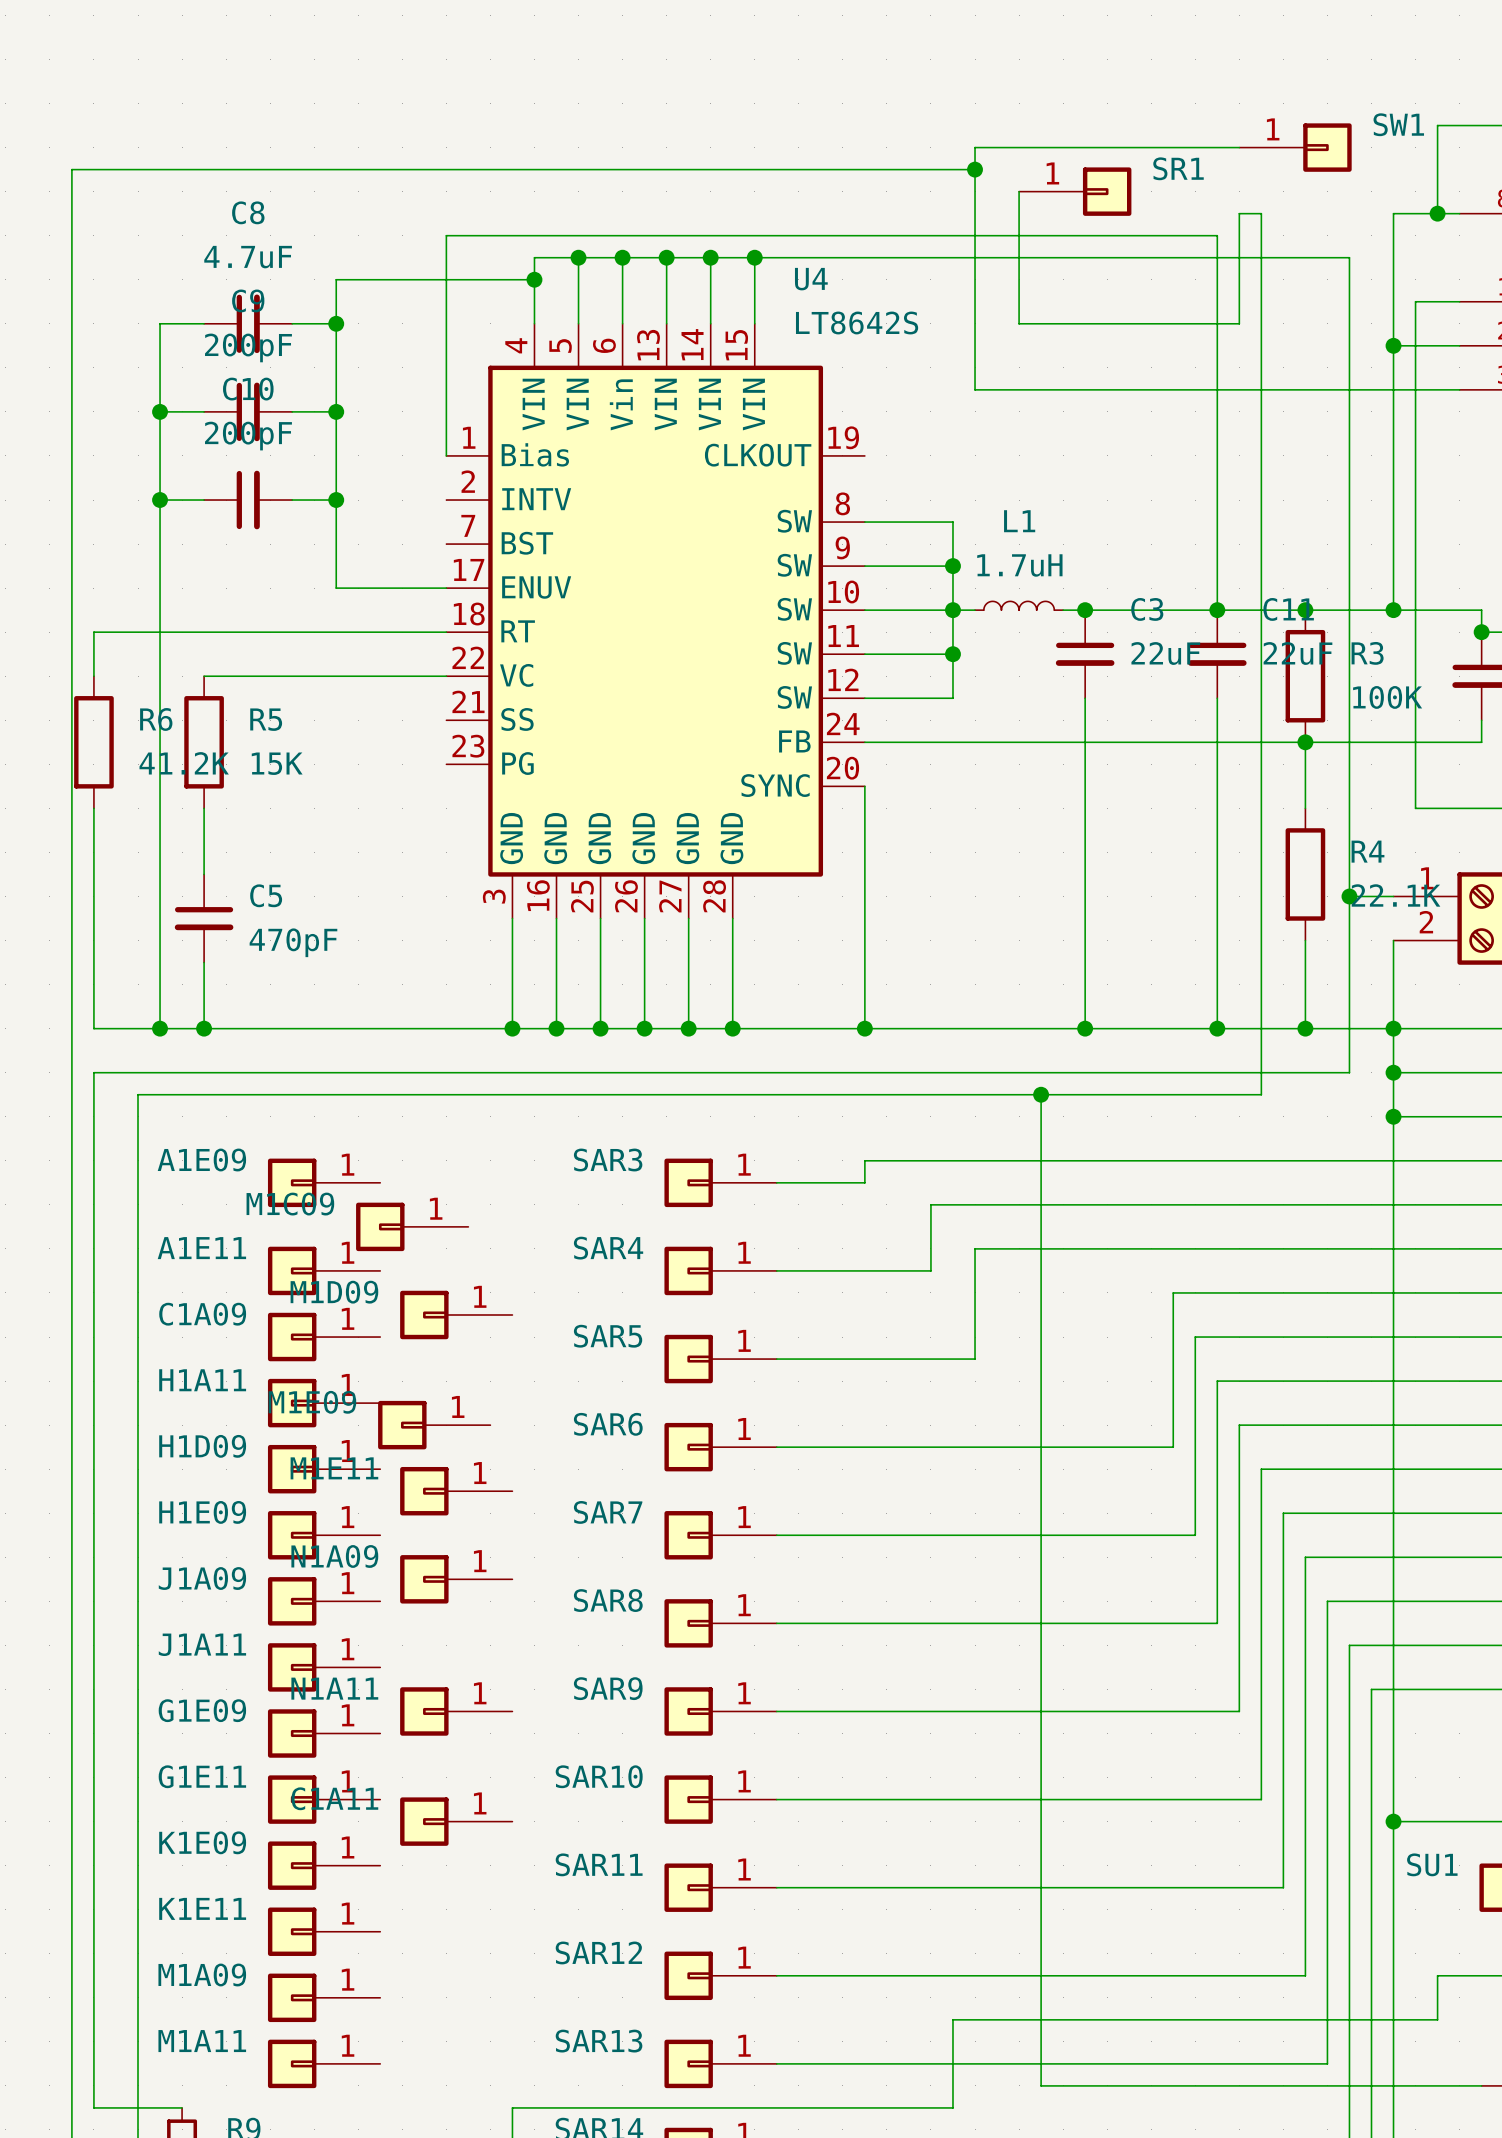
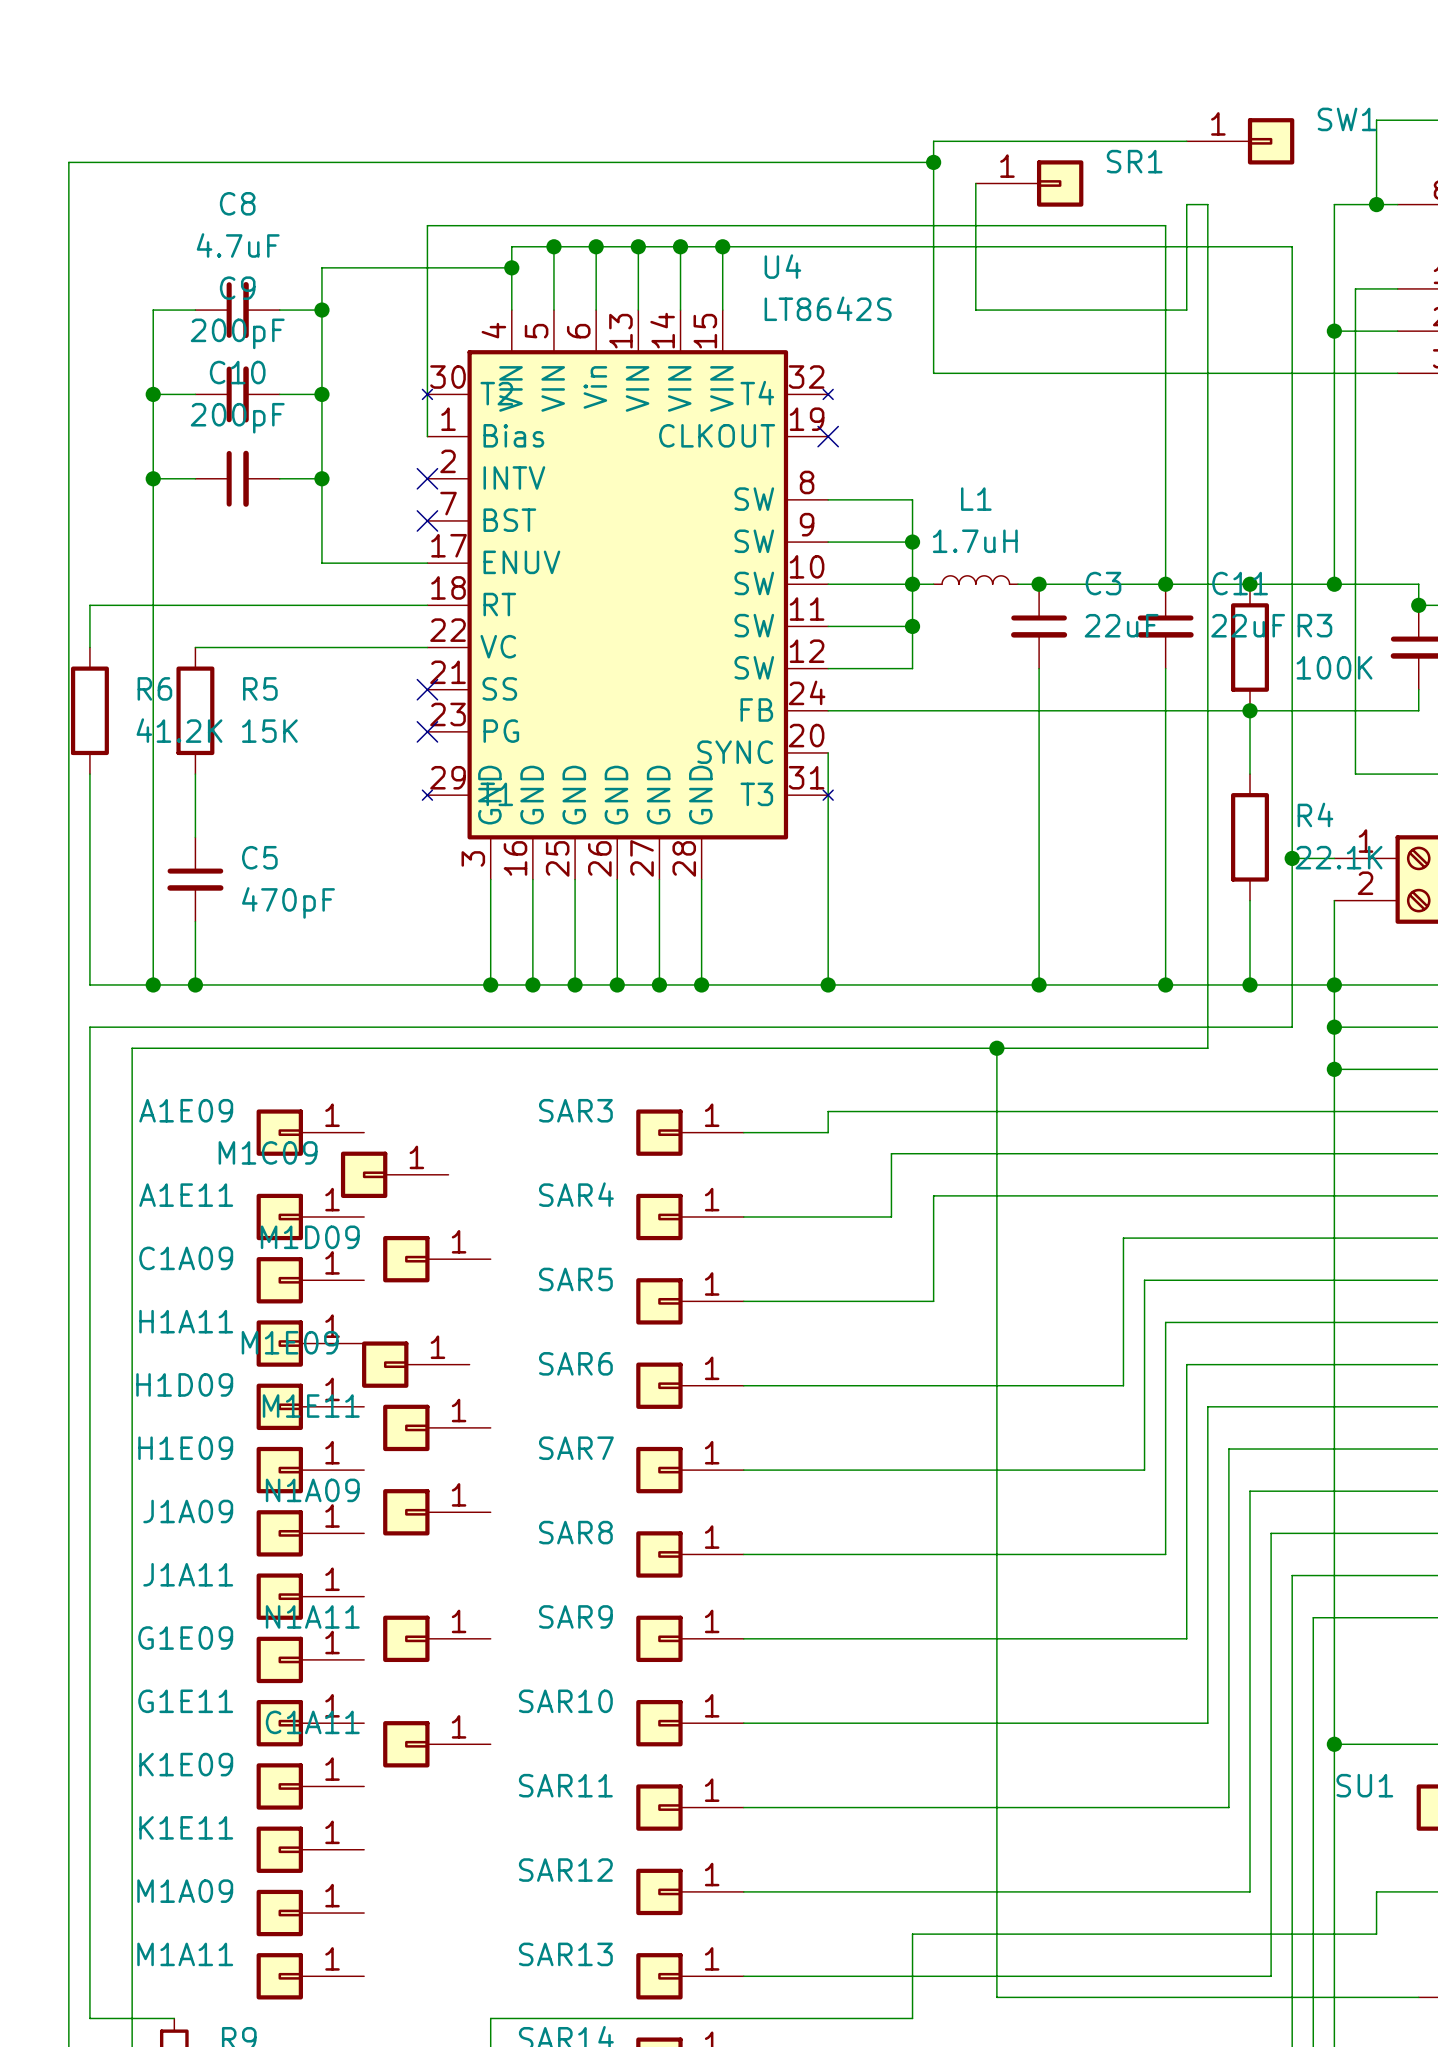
U4 symbol: [446, 323, 865, 919] -> [422, 310, 834, 880]
no-connect mark: none -> (828, 436)
no-connect mark: none -> (427, 478)
no-connect mark: none -> (427, 520)
no-connect mark: none -> (427, 689)
no-connect mark: none -> (427, 731)

